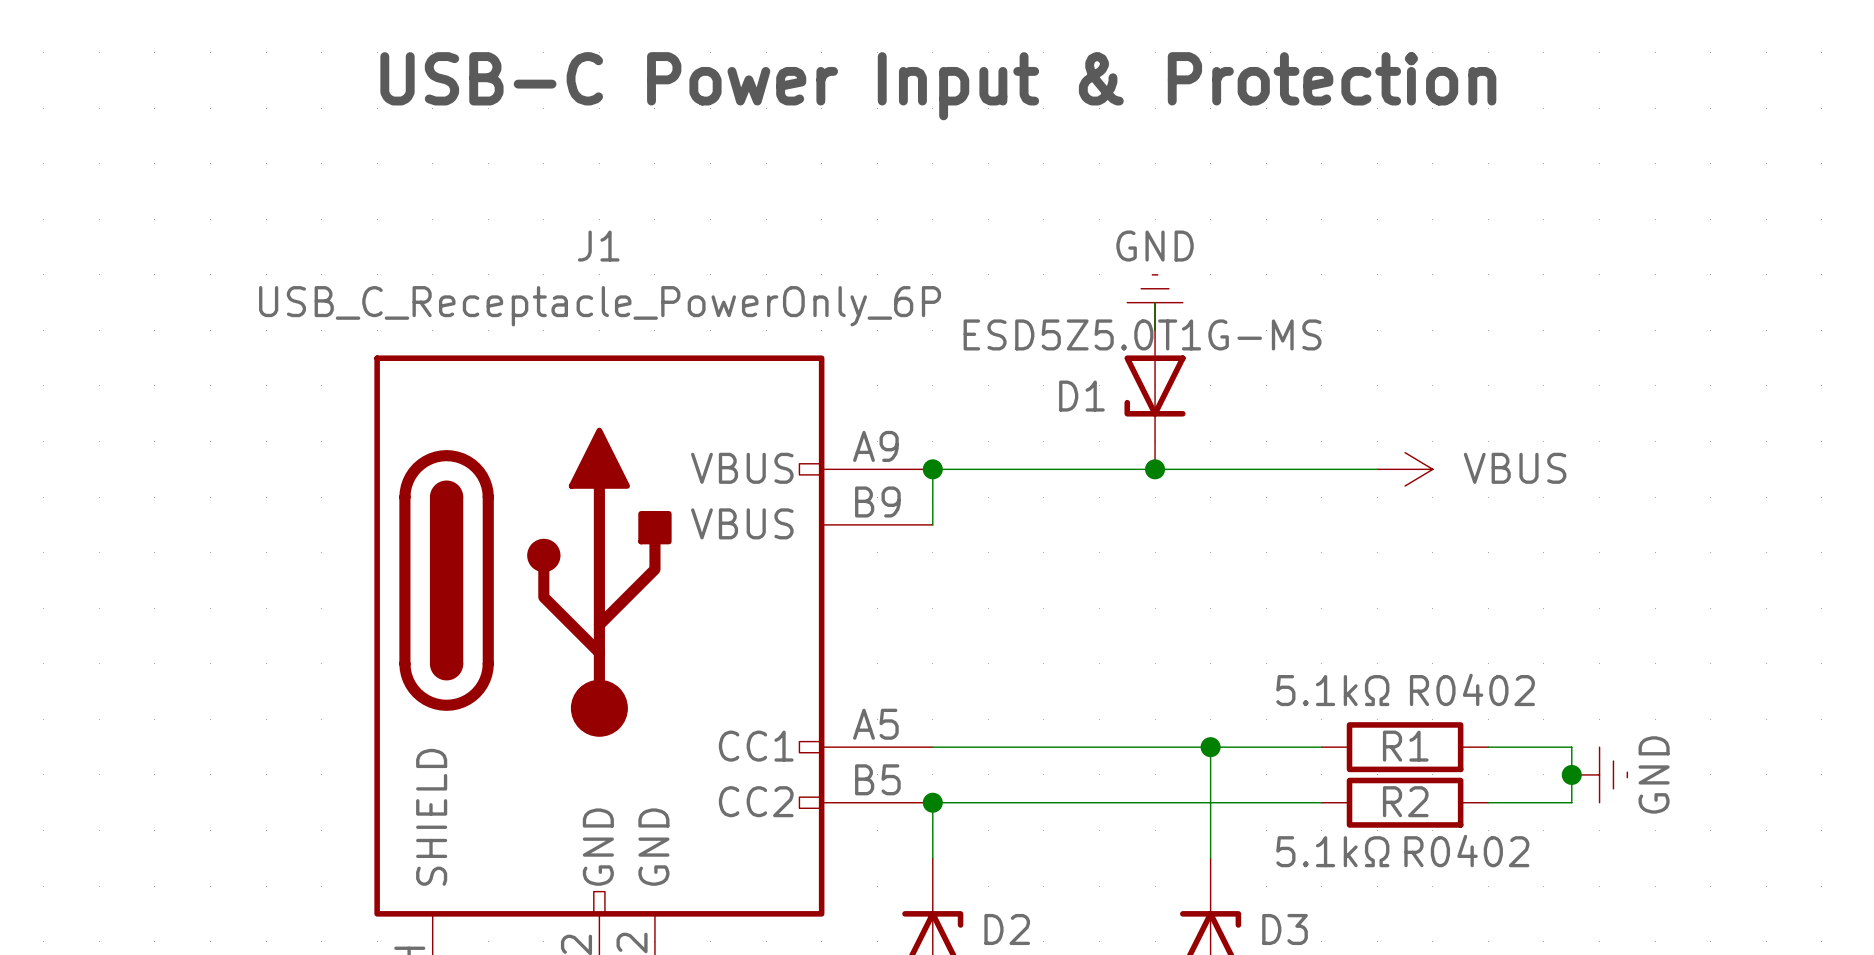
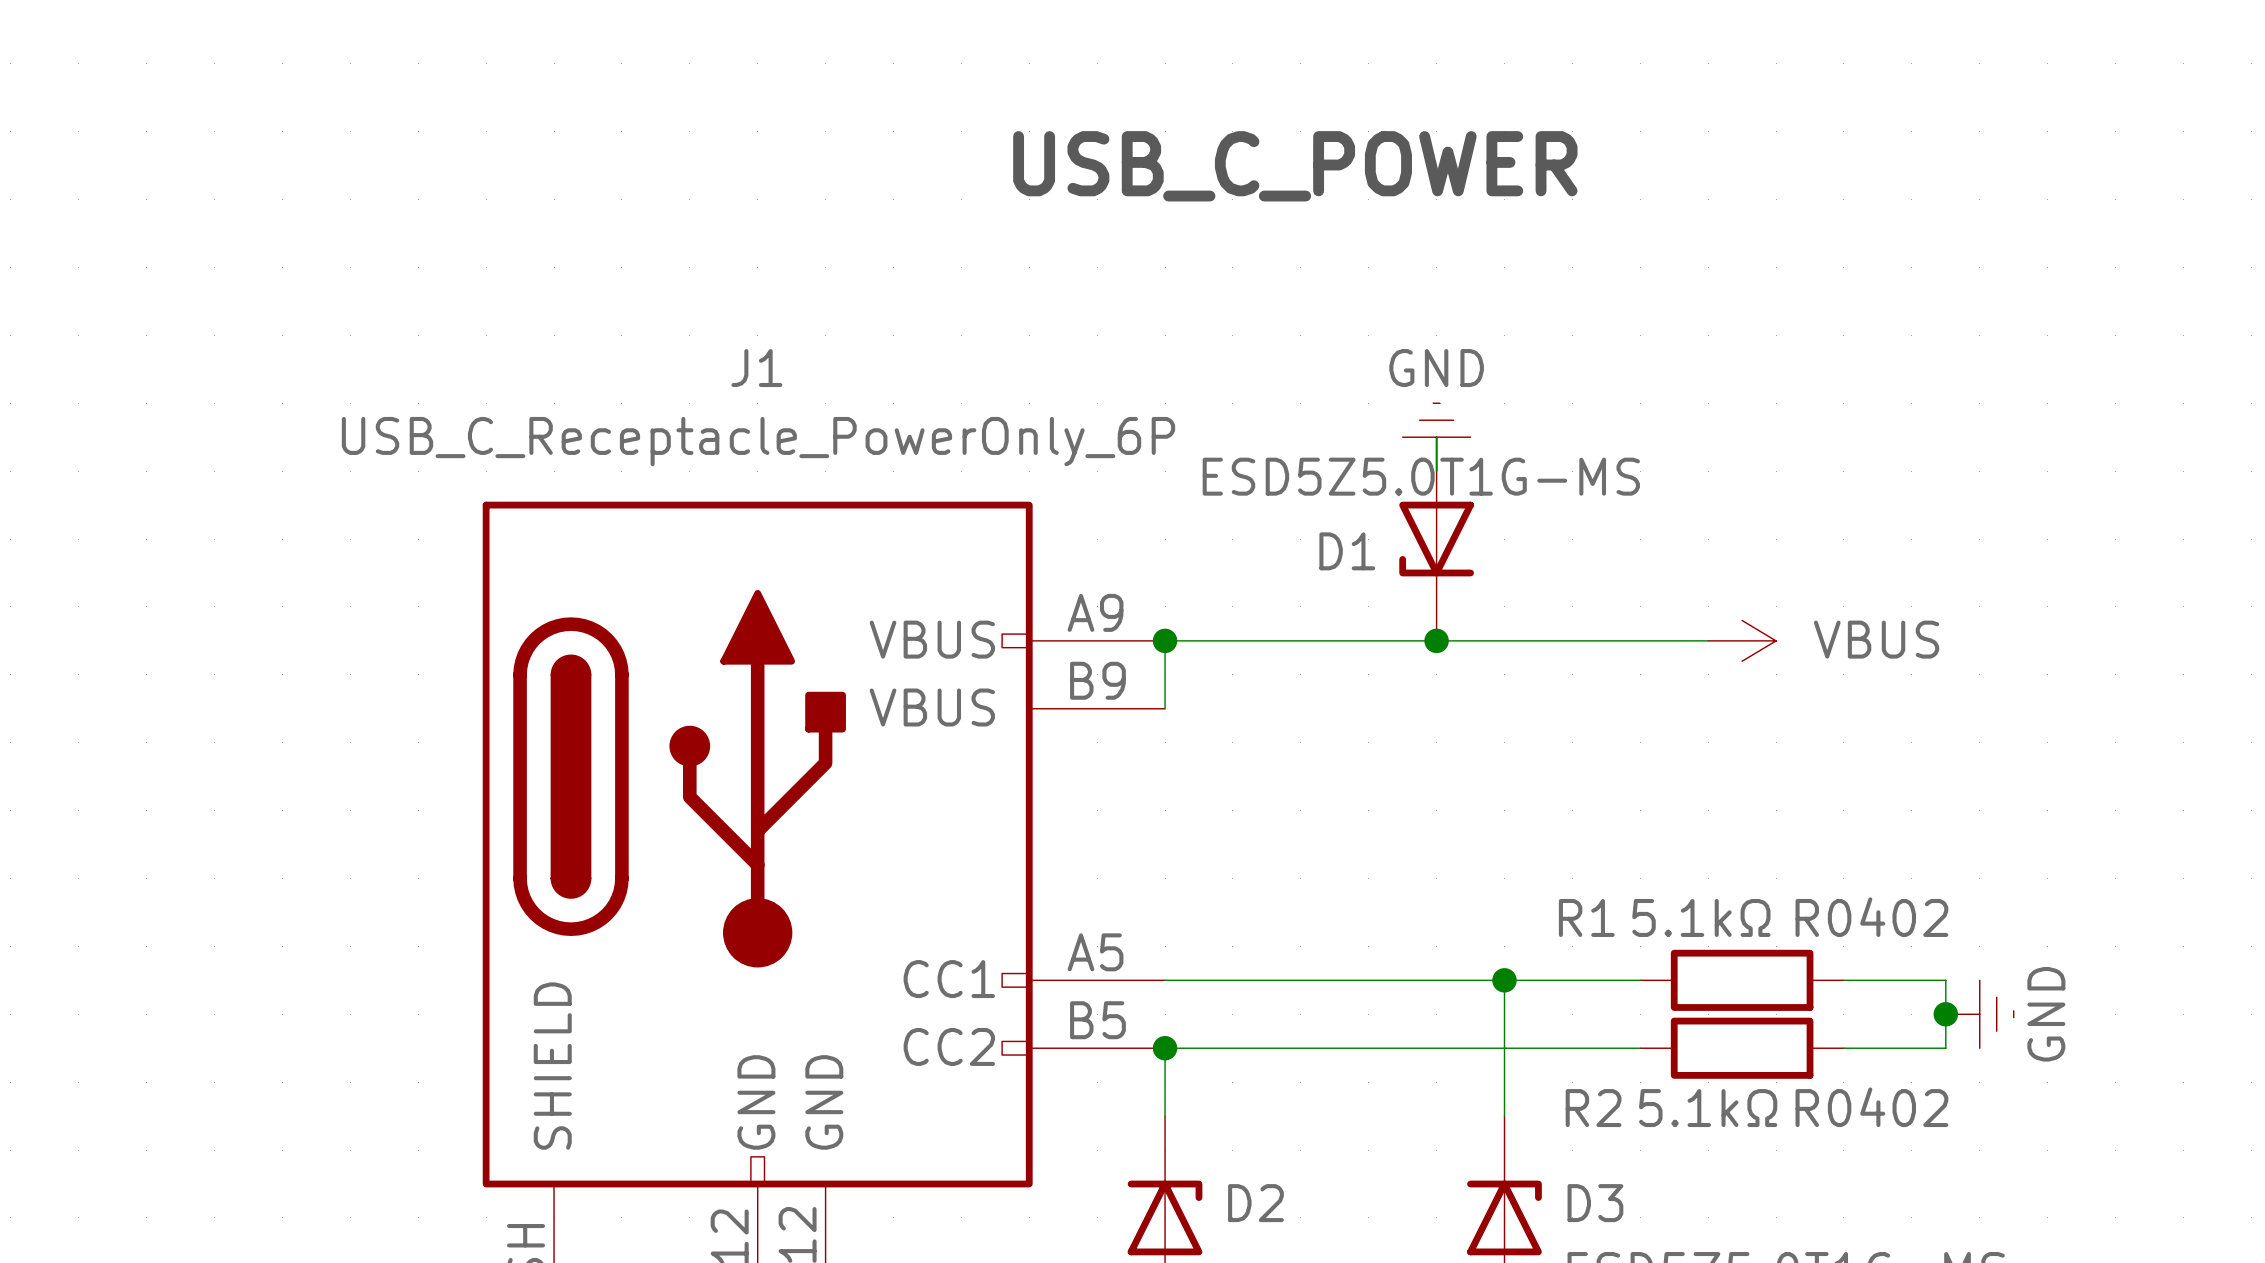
text: none -> USB_C_POWER (1295, 166)
text: USB-C Power Input & Protection (938, 86) -> none
R1 text position: R0402 (1472, 689) -> R0402 (1871, 917)
R1 value position: 5.1kΩ (1332, 690) -> 5.1kΩ (1701, 917)
R1 name position: R1 (1405, 746) -> R1 (1586, 917)
R2 name position: R2 (1405, 801) -> R2 (1593, 1108)
R2 value position: 5.1kΩ (1332, 851) -> 5.1kΩ (1708, 1108)
R2 text position: R0402 (1466, 851) -> R0402 (1871, 1107)

